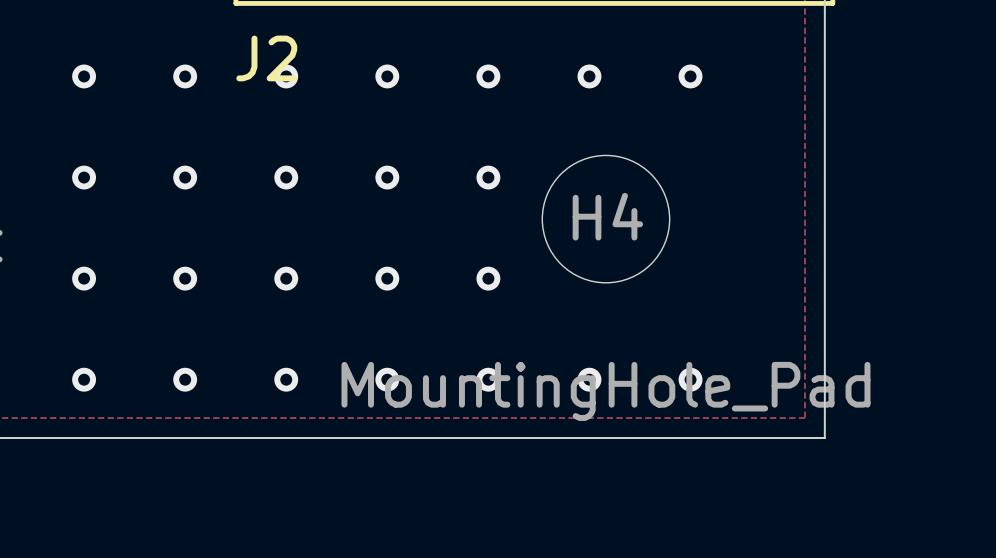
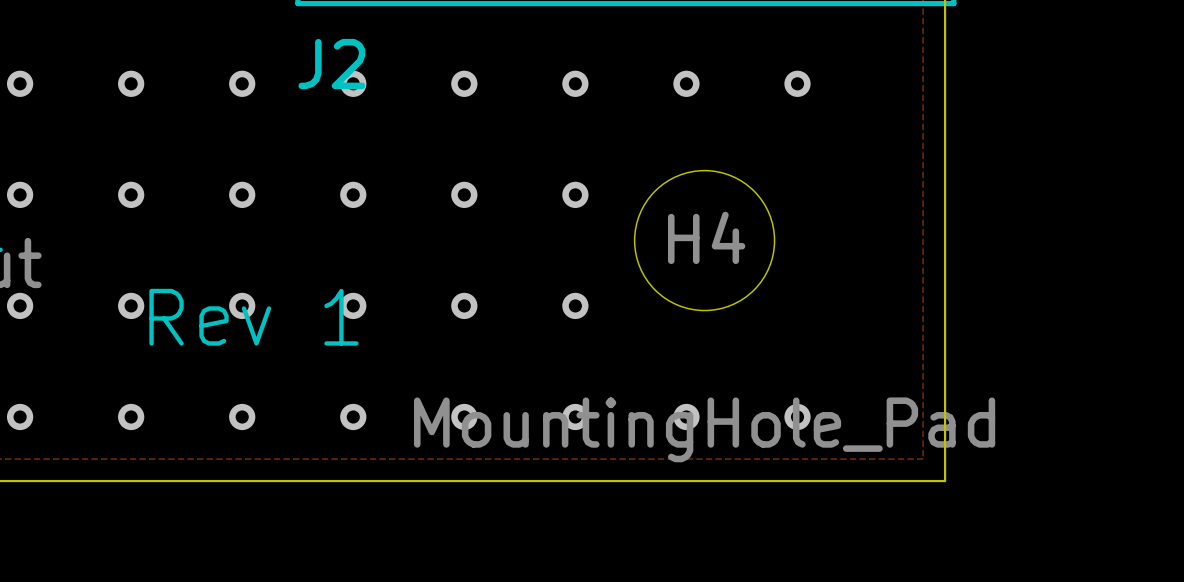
text: none -> Rev 1 (253, 317)

